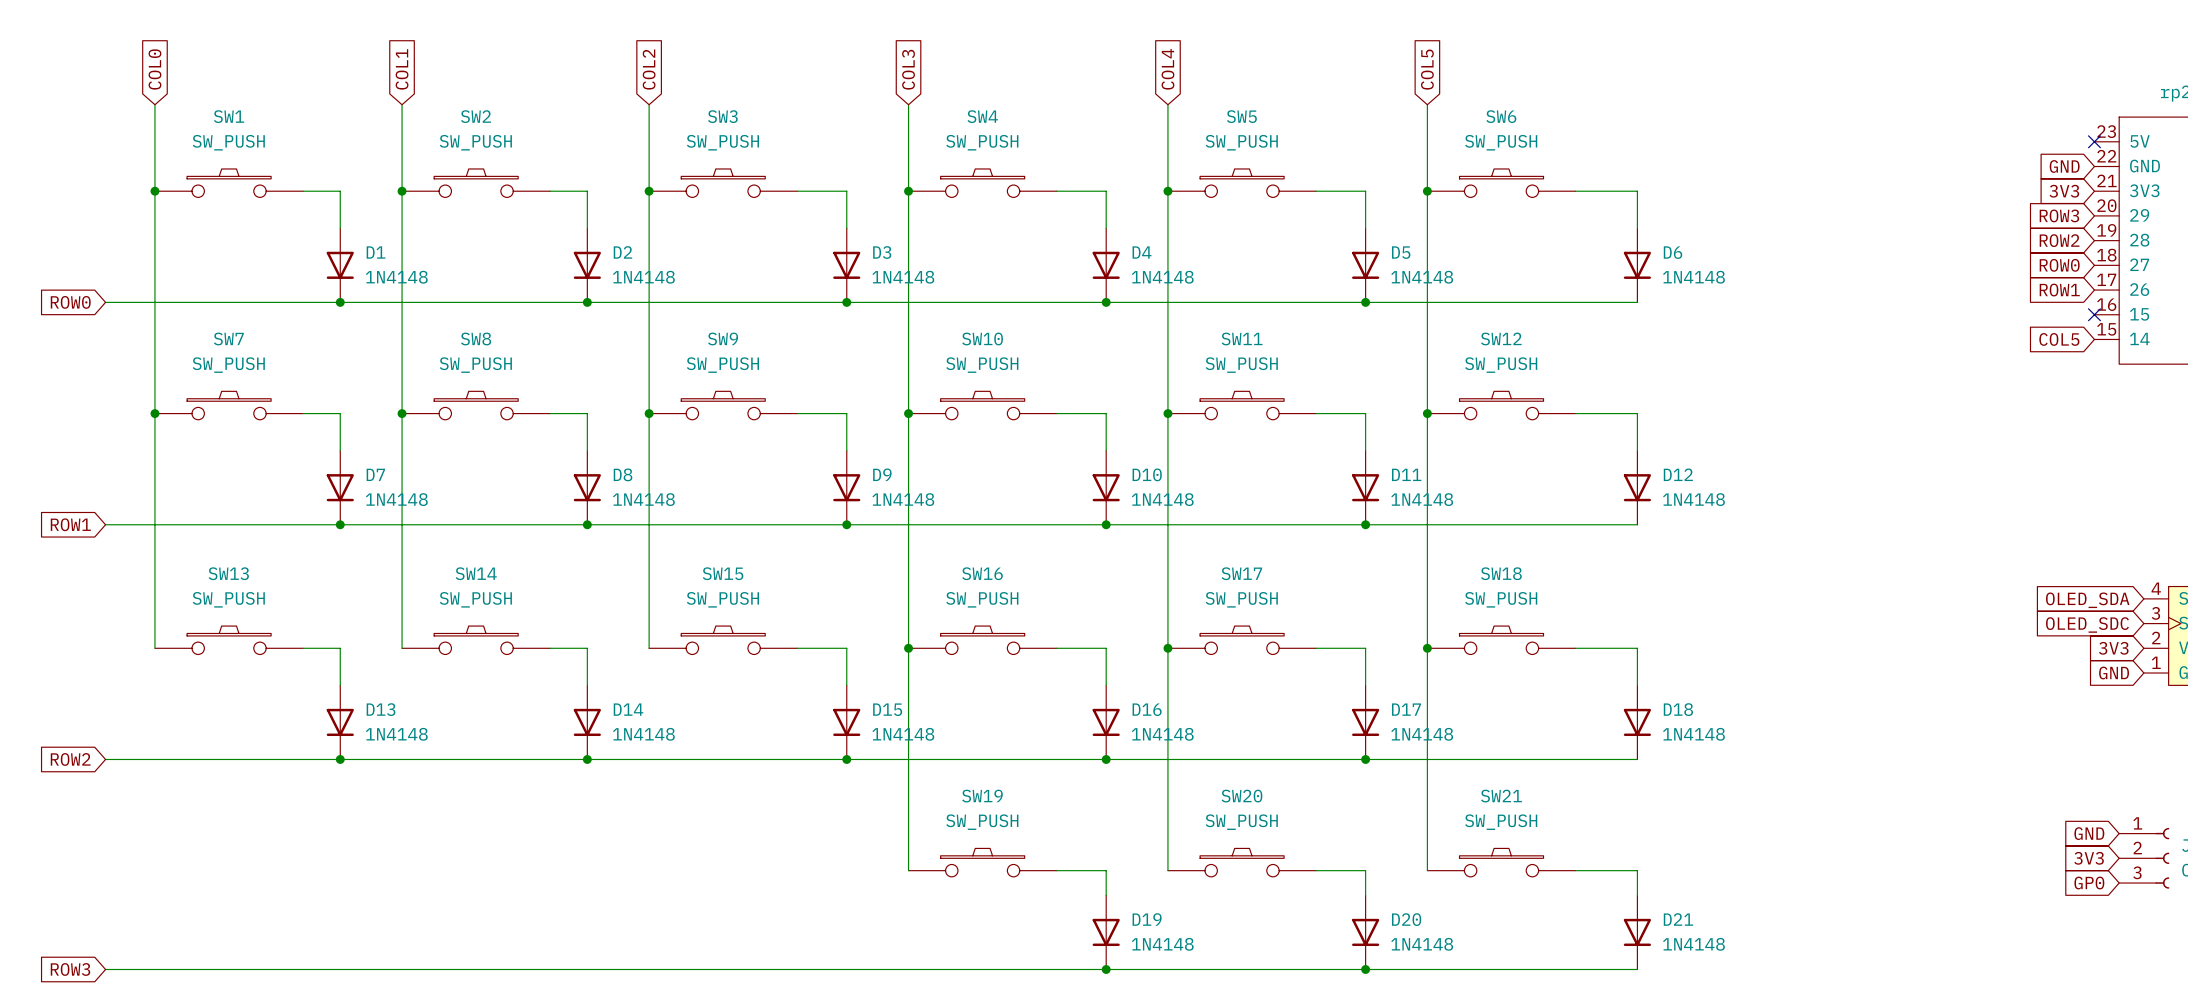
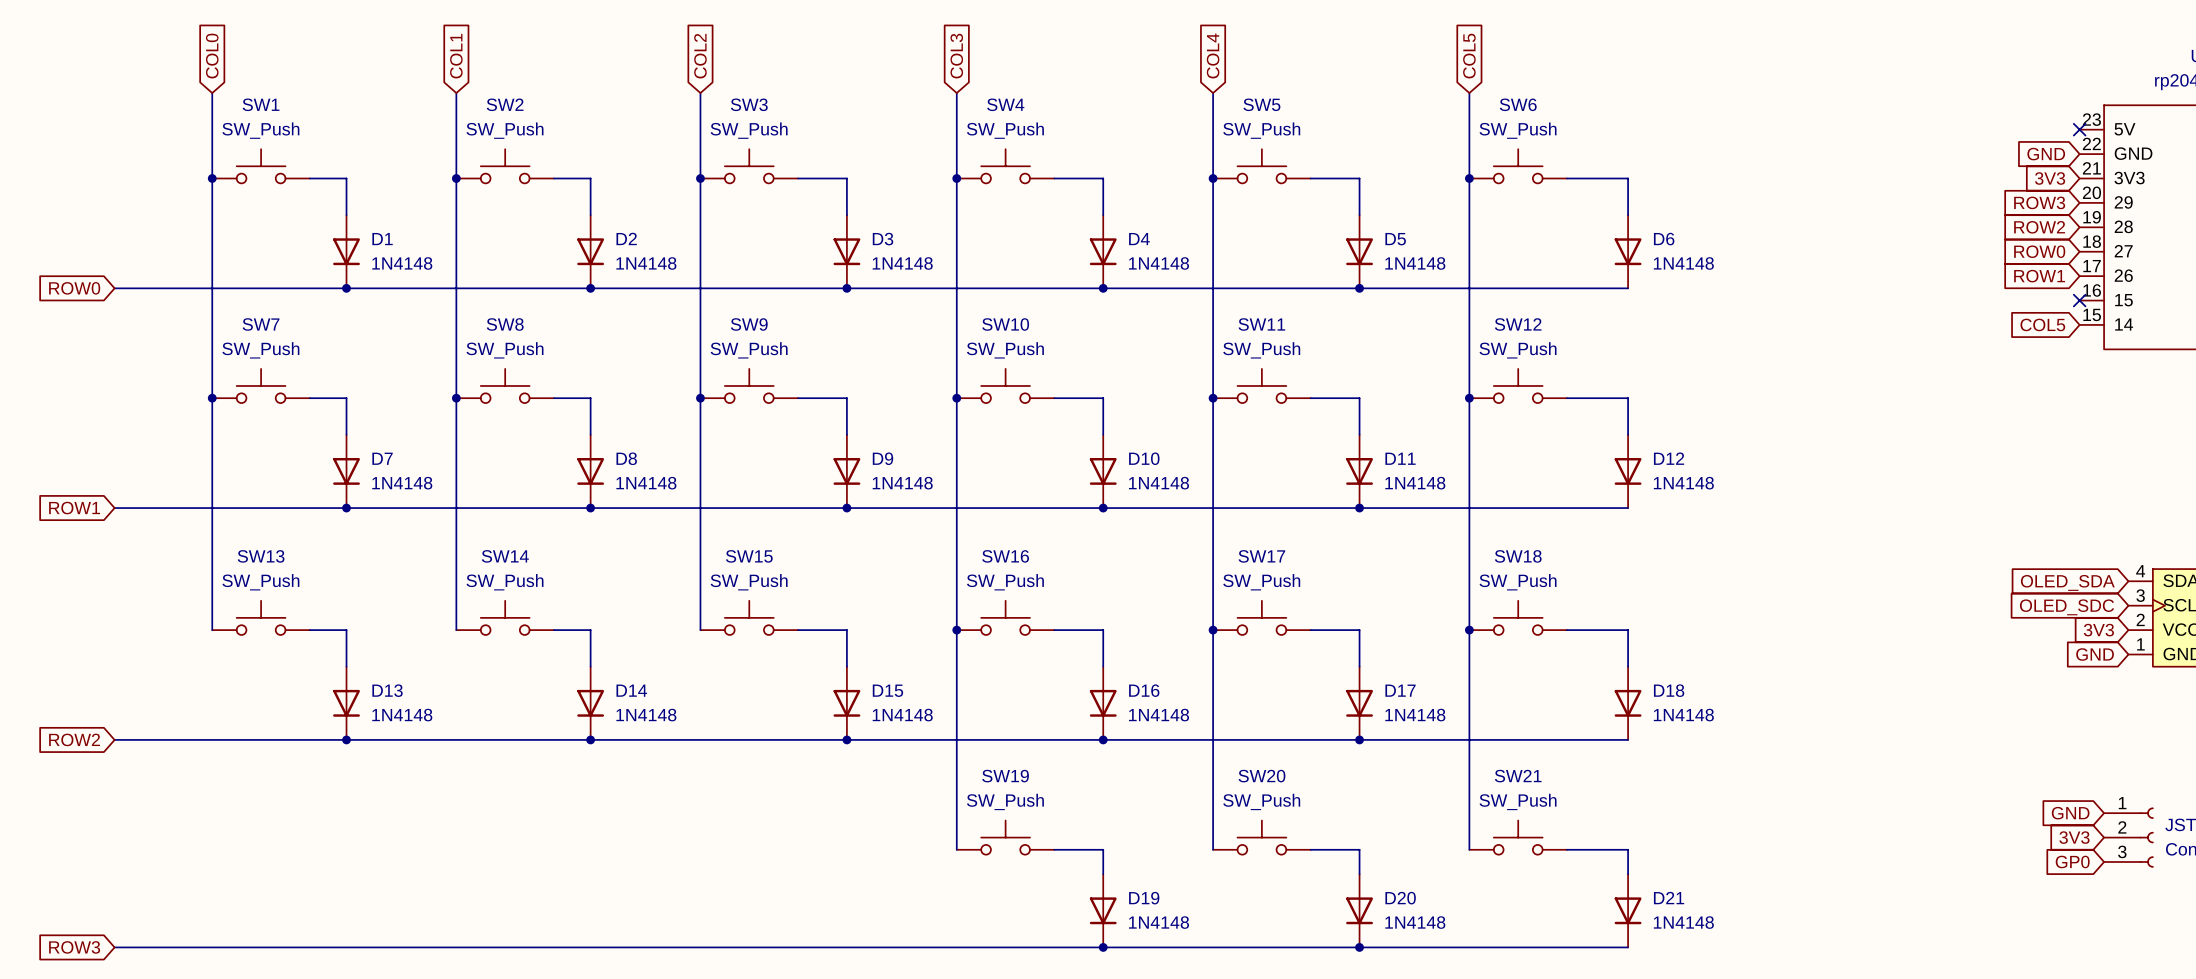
global label position: COL0 (154, 69) -> COL0 (212, 56)
global label position: COL1 (402, 69) -> COL1 (456, 56)
global label position: COL2 (649, 69) -> COL2 (700, 56)
global label position: COL3 (908, 69) -> COL3 (956, 56)
global label position: COL4 (1167, 69) -> COL4 (1213, 55)
global label position: COL5 (1427, 69) -> COL5 (1469, 56)
wire: (154, 104) (154, 648) -> (212, 93) (212, 630)
wire: (402, 104) (402, 648) -> (456, 93) (456, 630)
wire: (649, 104) (649, 648) -> (700, 93) (700, 630)
wire: (908, 104) (908, 870) -> (956, 93) (956, 849)
wire: (1167, 104) (1167, 870) -> (1213, 93) (1213, 849)
wire: (1427, 104) (1427, 870) -> (1469, 93) (1469, 849)
SW1 value: SW_PUSH (228, 142) -> SW_Push (260, 130)
SW2 value: SW_PUSH (475, 142) -> SW_Push (505, 130)
SW3 value: SW_PUSH (722, 142) -> SW_Push (749, 130)
SW4 value: SW_PUSH (982, 142) -> SW_Push (1005, 130)
SW5 value: SW_PUSH (1241, 142) -> SW_Push (1261, 130)
SW6 value: SW_PUSH (1501, 142) -> SW_Push (1518, 130)
SW1 symbol: [154, 168, 304, 198] -> [212, 149, 310, 184]
SW2 symbol: [402, 168, 551, 198] -> [456, 149, 555, 184]
SW3 symbol: [649, 168, 798, 198] -> [700, 149, 799, 184]
SW4 symbol: [908, 168, 1057, 198] -> [956, 149, 1055, 184]
SW5 symbol: [1167, 168, 1317, 198] -> [1213, 149, 1311, 184]
SW6 symbol: [1427, 168, 1576, 198] -> [1469, 149, 1568, 184]
junction position: (154, 191) -> (212, 178)
junction position: (402, 191) -> (456, 178)
junction position: (649, 191) -> (700, 178)
junction position: (908, 191) -> (956, 178)
junction position: (1167, 191) -> (1213, 178)
junction position: (1427, 191) -> (1469, 178)
SW7 value: SW_PUSH (228, 365) -> SW_Push (260, 350)
SW8 value: SW_PUSH (475, 365) -> SW_Push (505, 350)
SW9 value: SW_PUSH (722, 365) -> SW_Push (749, 350)
SW10 value: SW_PUSH (982, 365) -> SW_Push (1005, 350)
SW11 value: SW_PUSH (1241, 365) -> SW_Push (1261, 350)
SW12 value: SW_PUSH (1501, 365) -> SW_Push (1518, 350)
SW7 symbol: [154, 391, 304, 420] -> [212, 368, 310, 404]
SW8 symbol: [402, 391, 551, 420] -> [456, 368, 555, 404]
SW9 symbol: [649, 391, 798, 420] -> [700, 368, 799, 404]
SW10 symbol: [908, 391, 1057, 420] -> [956, 368, 1055, 404]
SW11 symbol: [1167, 391, 1317, 420] -> [1213, 368, 1311, 404]
SW12 symbol: [1427, 391, 1576, 420] -> [1469, 368, 1568, 404]
junction position: (154, 413) -> (212, 398)
junction position: (402, 413) -> (456, 398)
junction position: (649, 413) -> (700, 398)
junction position: (908, 413) -> (956, 398)
junction position: (1167, 413) -> (1213, 398)
junction position: (1427, 413) -> (1469, 398)
SW13 value: SW_PUSH (228, 599) -> SW_Push (260, 582)
SW14 value: SW_PUSH (475, 599) -> SW_Push (505, 582)
SW15 value: SW_PUSH (722, 599) -> SW_Push (749, 582)
SW16 value: SW_PUSH (982, 599) -> SW_Push (1005, 582)
SW17 value: SW_PUSH (1241, 599) -> SW_Push (1261, 582)
SW18 value: SW_PUSH (1501, 599) -> SW_Push (1518, 582)
SW13 symbol: [154, 626, 304, 655] -> [212, 600, 310, 635]
SW14 symbol: [402, 626, 551, 655] -> [456, 600, 555, 635]
SW15 symbol: [649, 626, 798, 655] -> [700, 600, 799, 635]
SW16 symbol: [908, 626, 1057, 655] -> [956, 600, 1055, 635]
SW17 symbol: [1167, 626, 1317, 655] -> [1213, 600, 1311, 635]
SW18 symbol: [1427, 626, 1576, 655] -> [1469, 600, 1568, 635]
junction position: (908, 648) -> (956, 630)
junction position: (1167, 648) -> (1213, 630)
junction position: (1427, 648) -> (1469, 630)
SW19 value: SW_PUSH (982, 822) -> SW_Push (1005, 801)
SW20 value: SW_PUSH (1241, 822) -> SW_Push (1261, 801)
SW21 value: SW_PUSH (1501, 822) -> SW_Push (1518, 801)
SW19 symbol: [908, 848, 1057, 877] -> [956, 820, 1055, 855]
SW20 symbol: [1167, 848, 1317, 877] -> [1213, 820, 1311, 855]
SW21 symbol: [1427, 848, 1576, 877] -> [1469, 820, 1568, 855]

